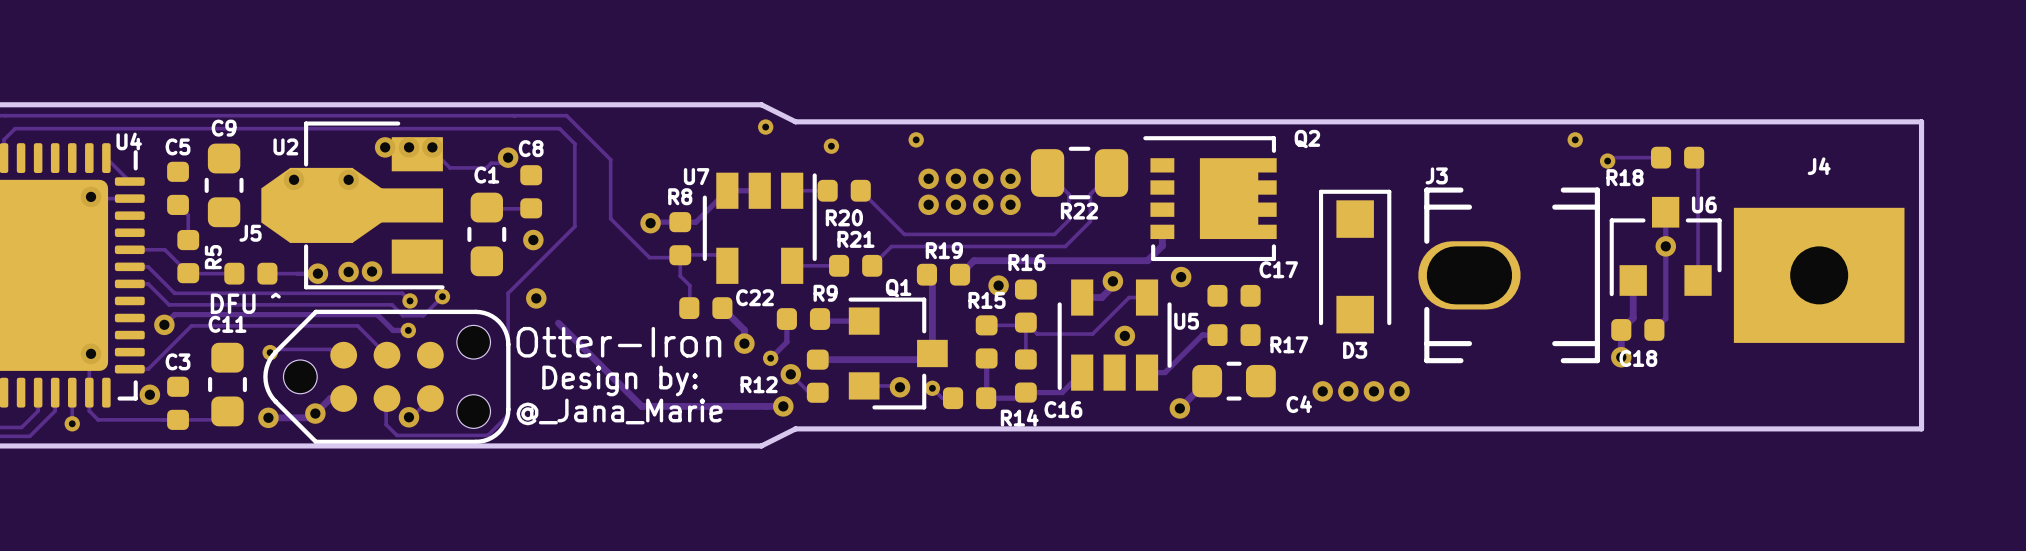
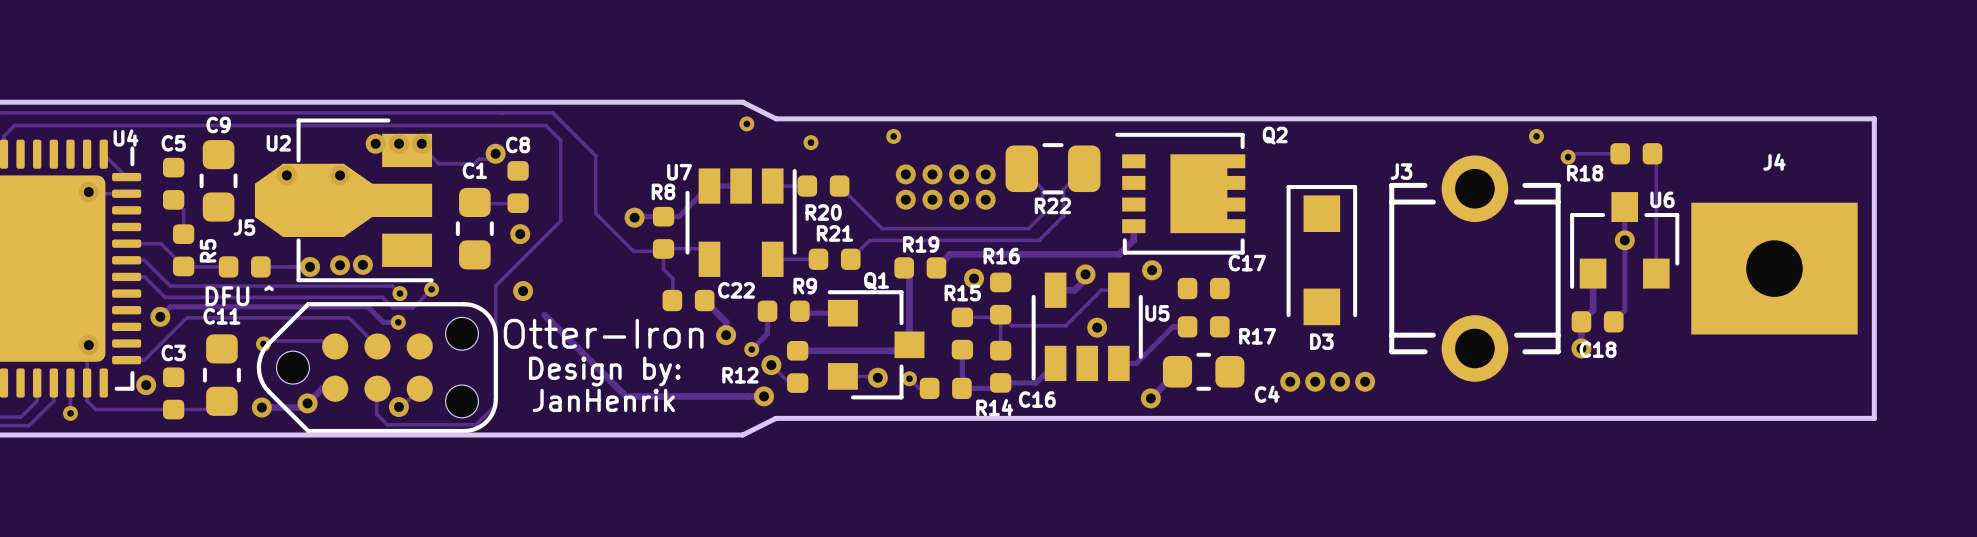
J3 footprint: [1418, 187, 1600, 364] -> [1389, 155, 1561, 382]
text: @_Jana_Marie (619, 411) -> JanHenrik (603, 400)

